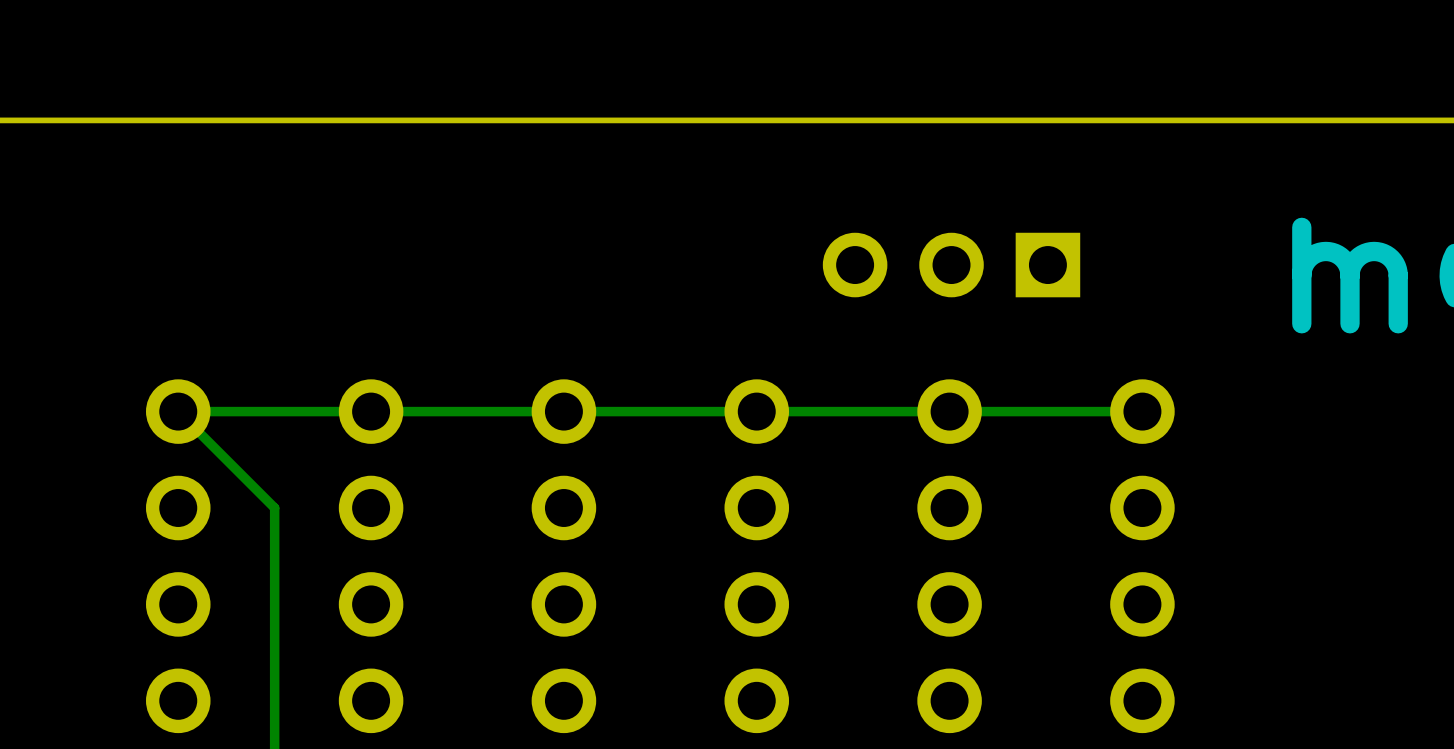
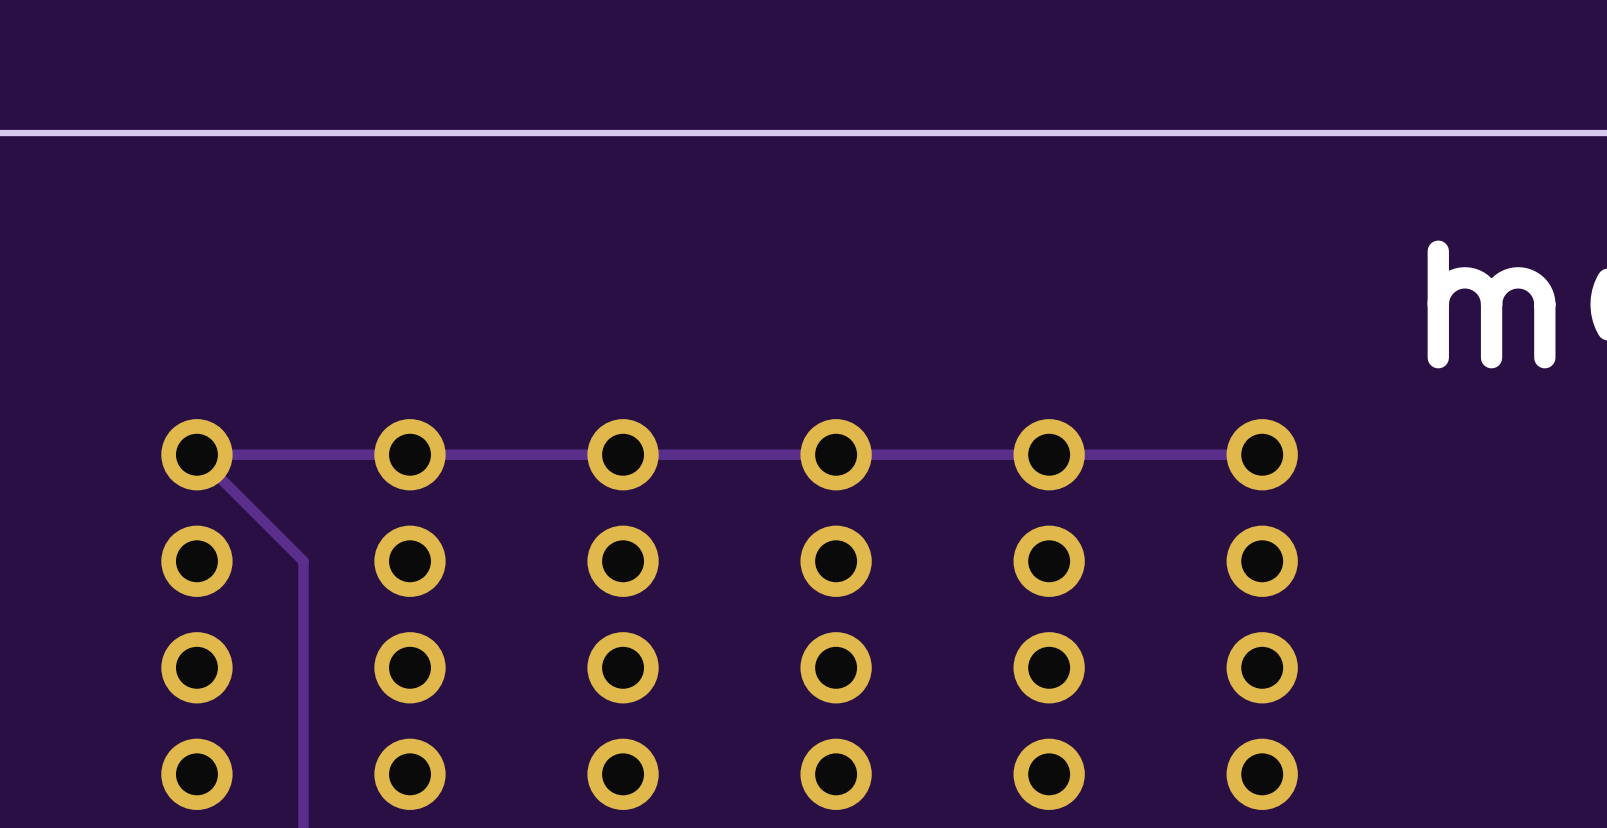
part: (951, 265) -> none

